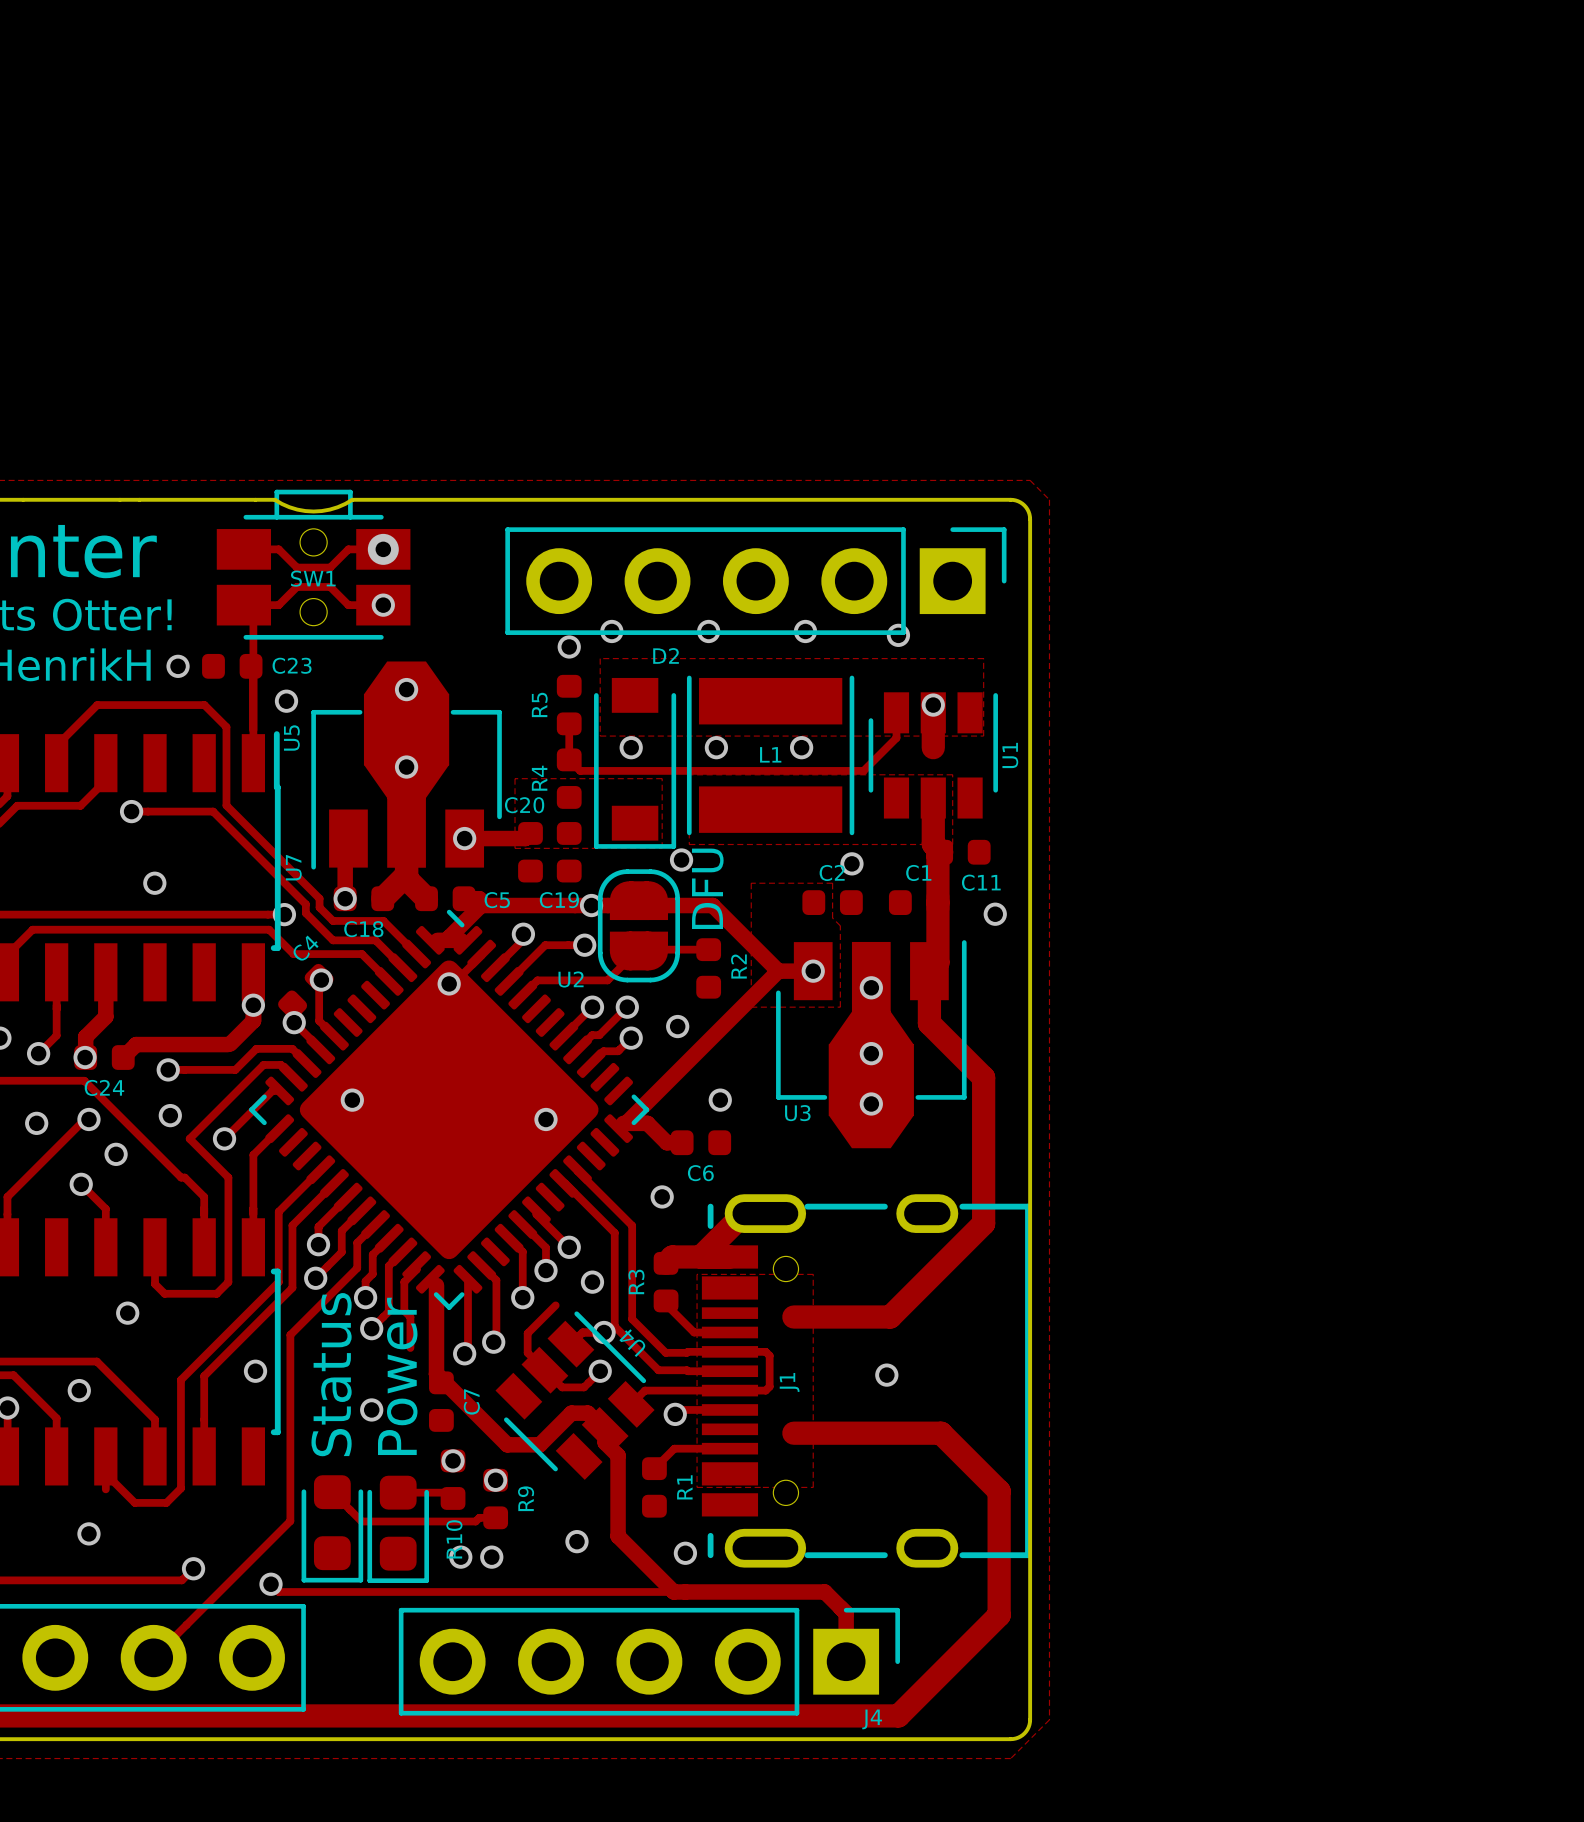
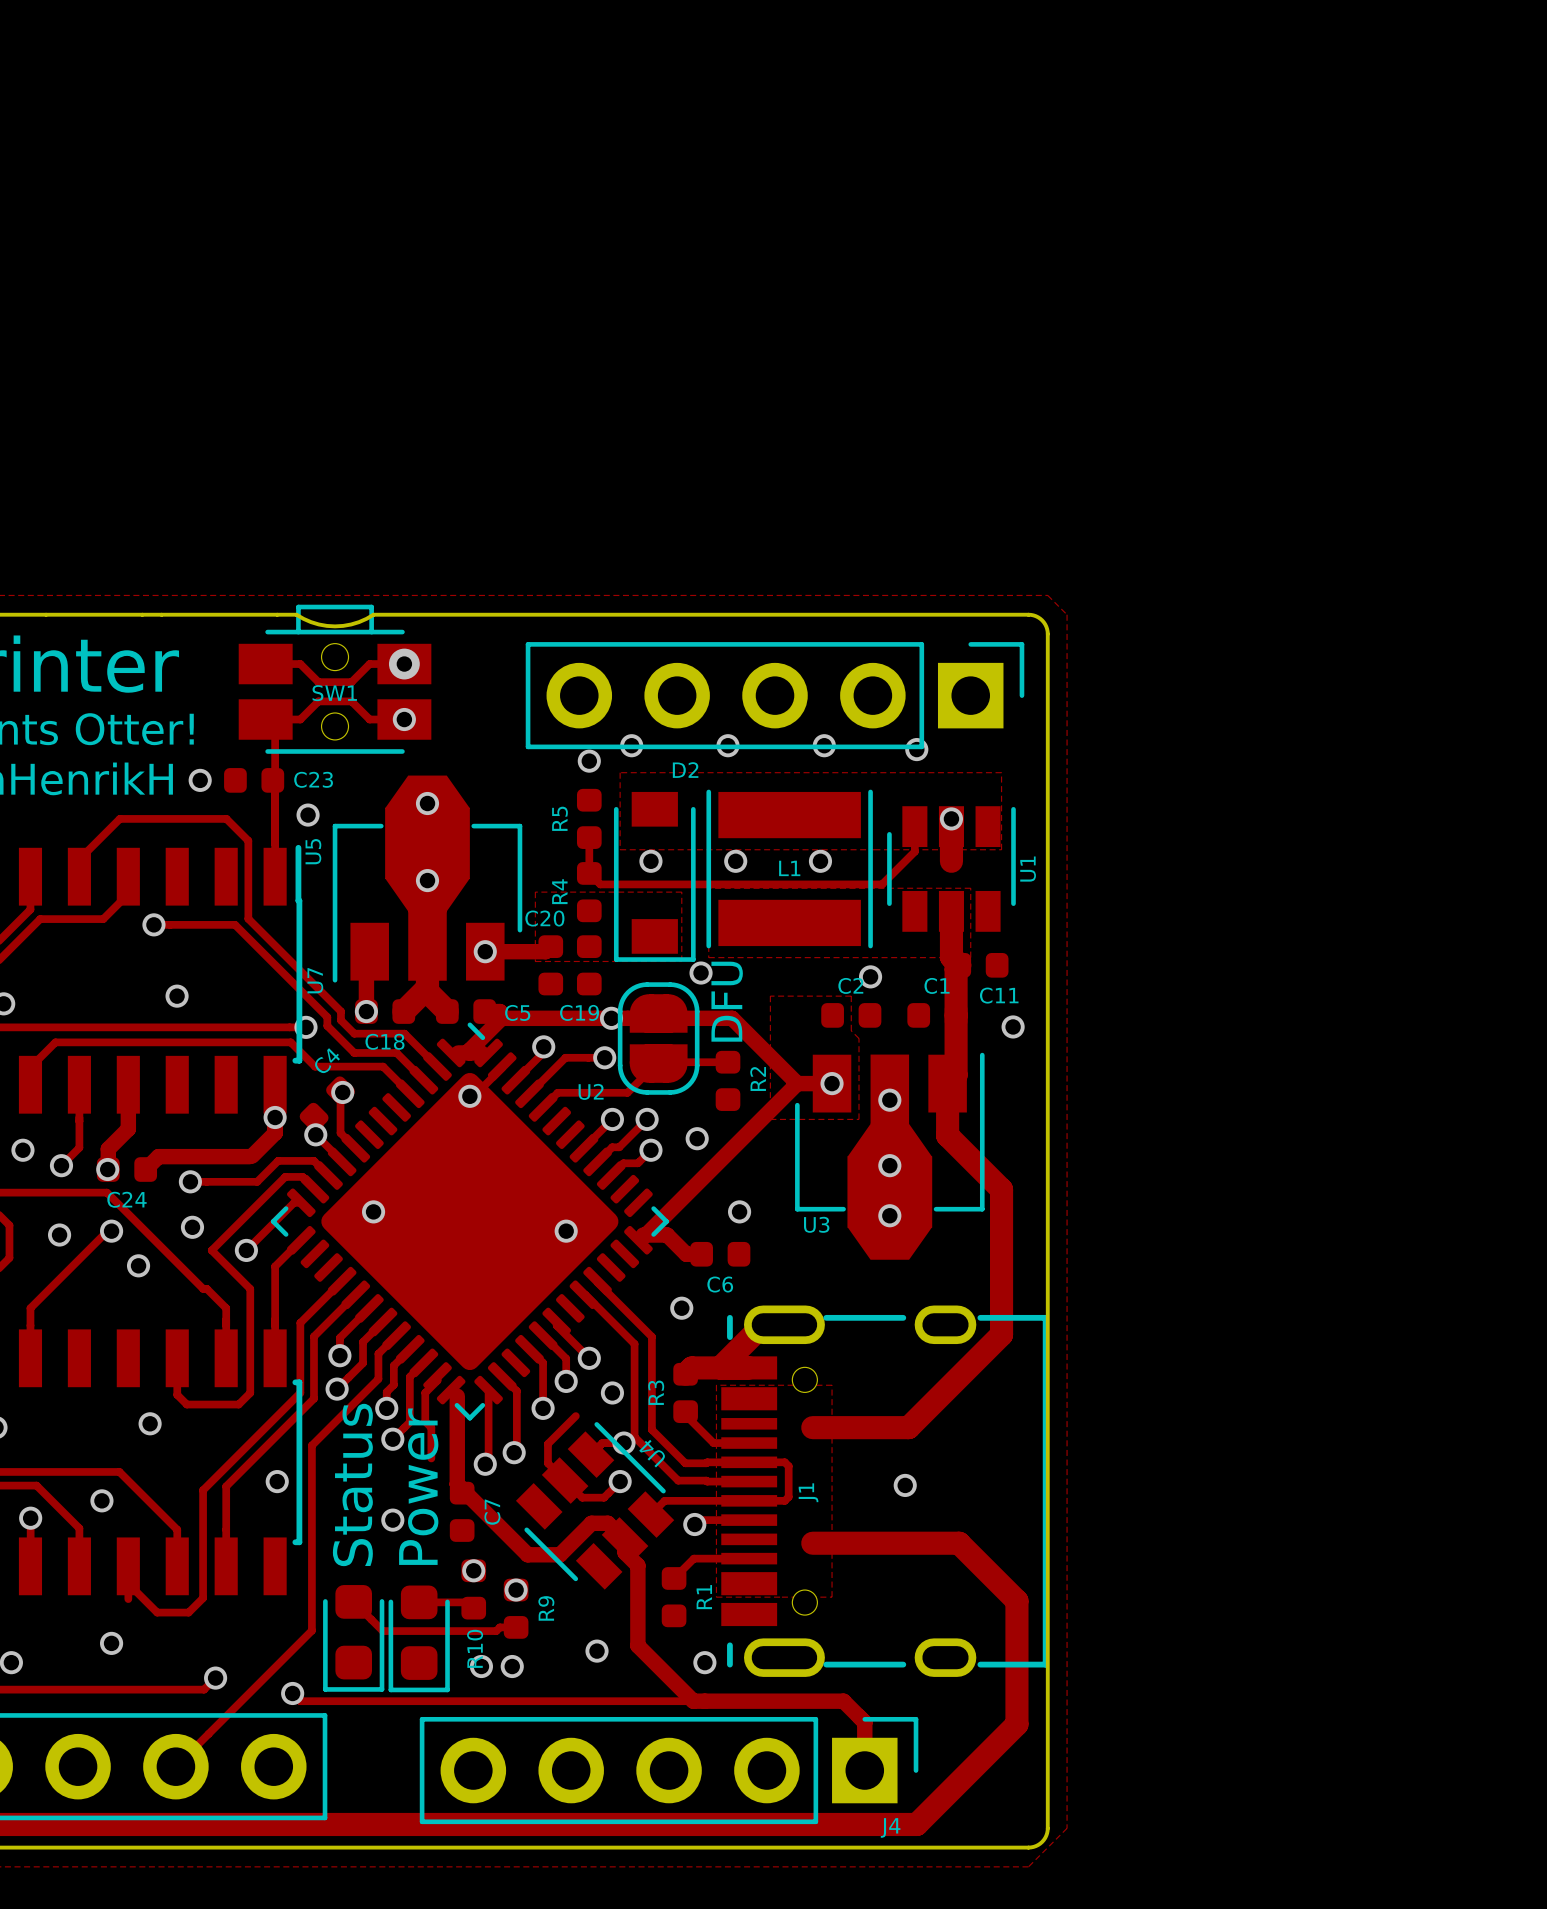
track: (81, 1184) (105, 1208) (105, 1247) -> none
via: (81, 1184) -> none

